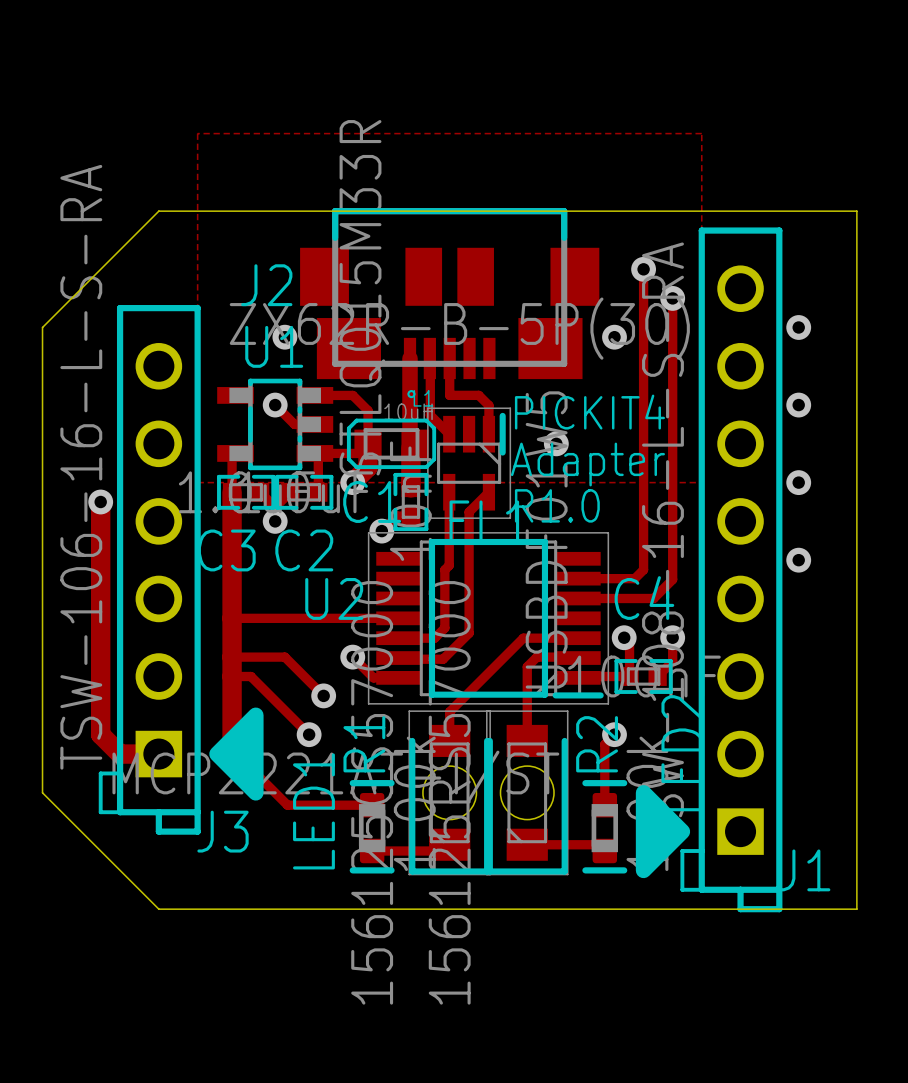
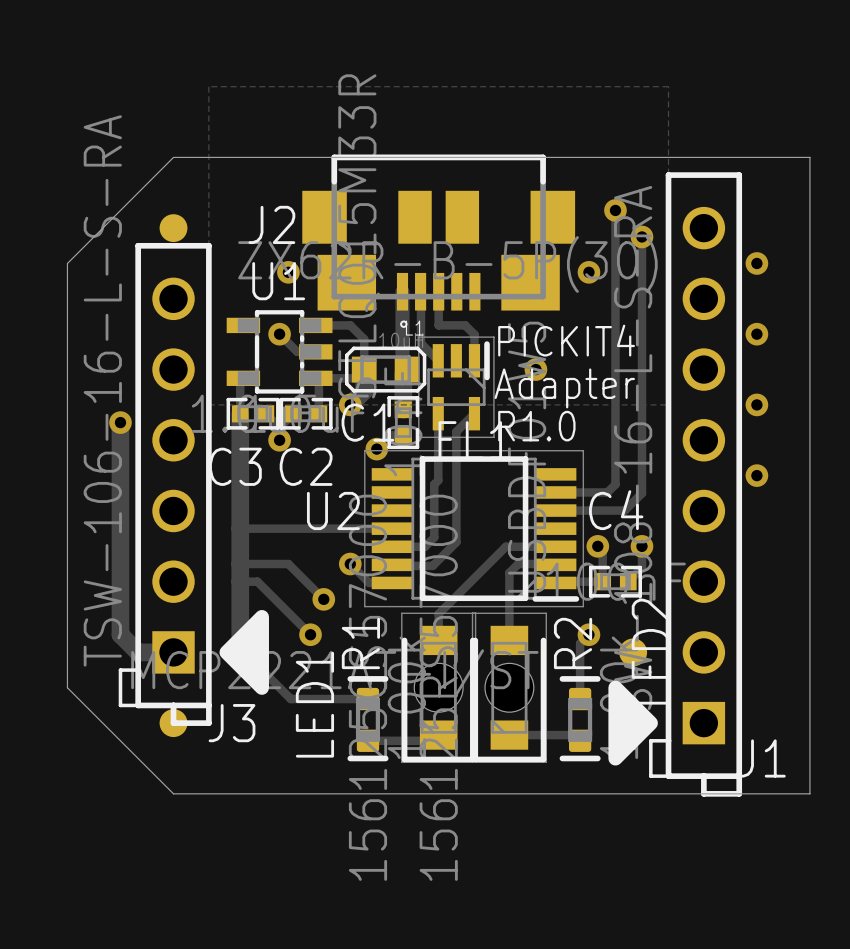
part: none -> (173, 228)
part: none -> (633, 652)
part: none -> (173, 723)

